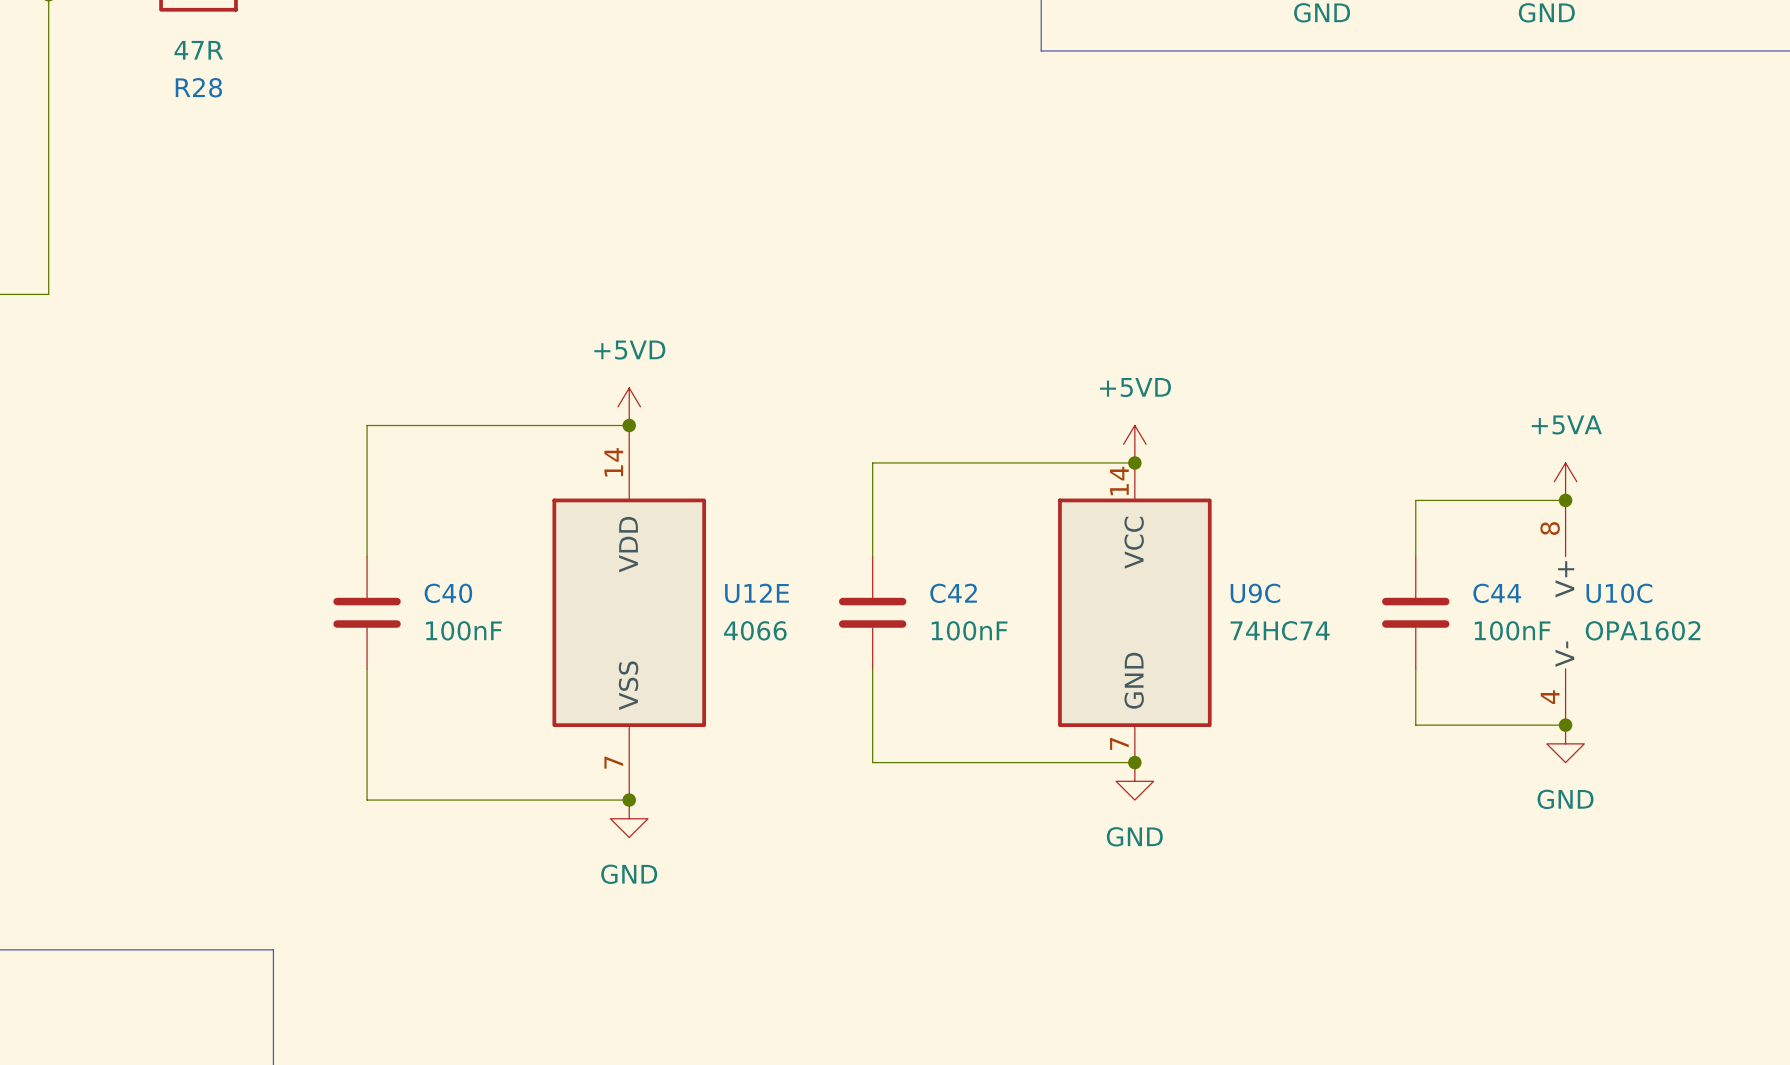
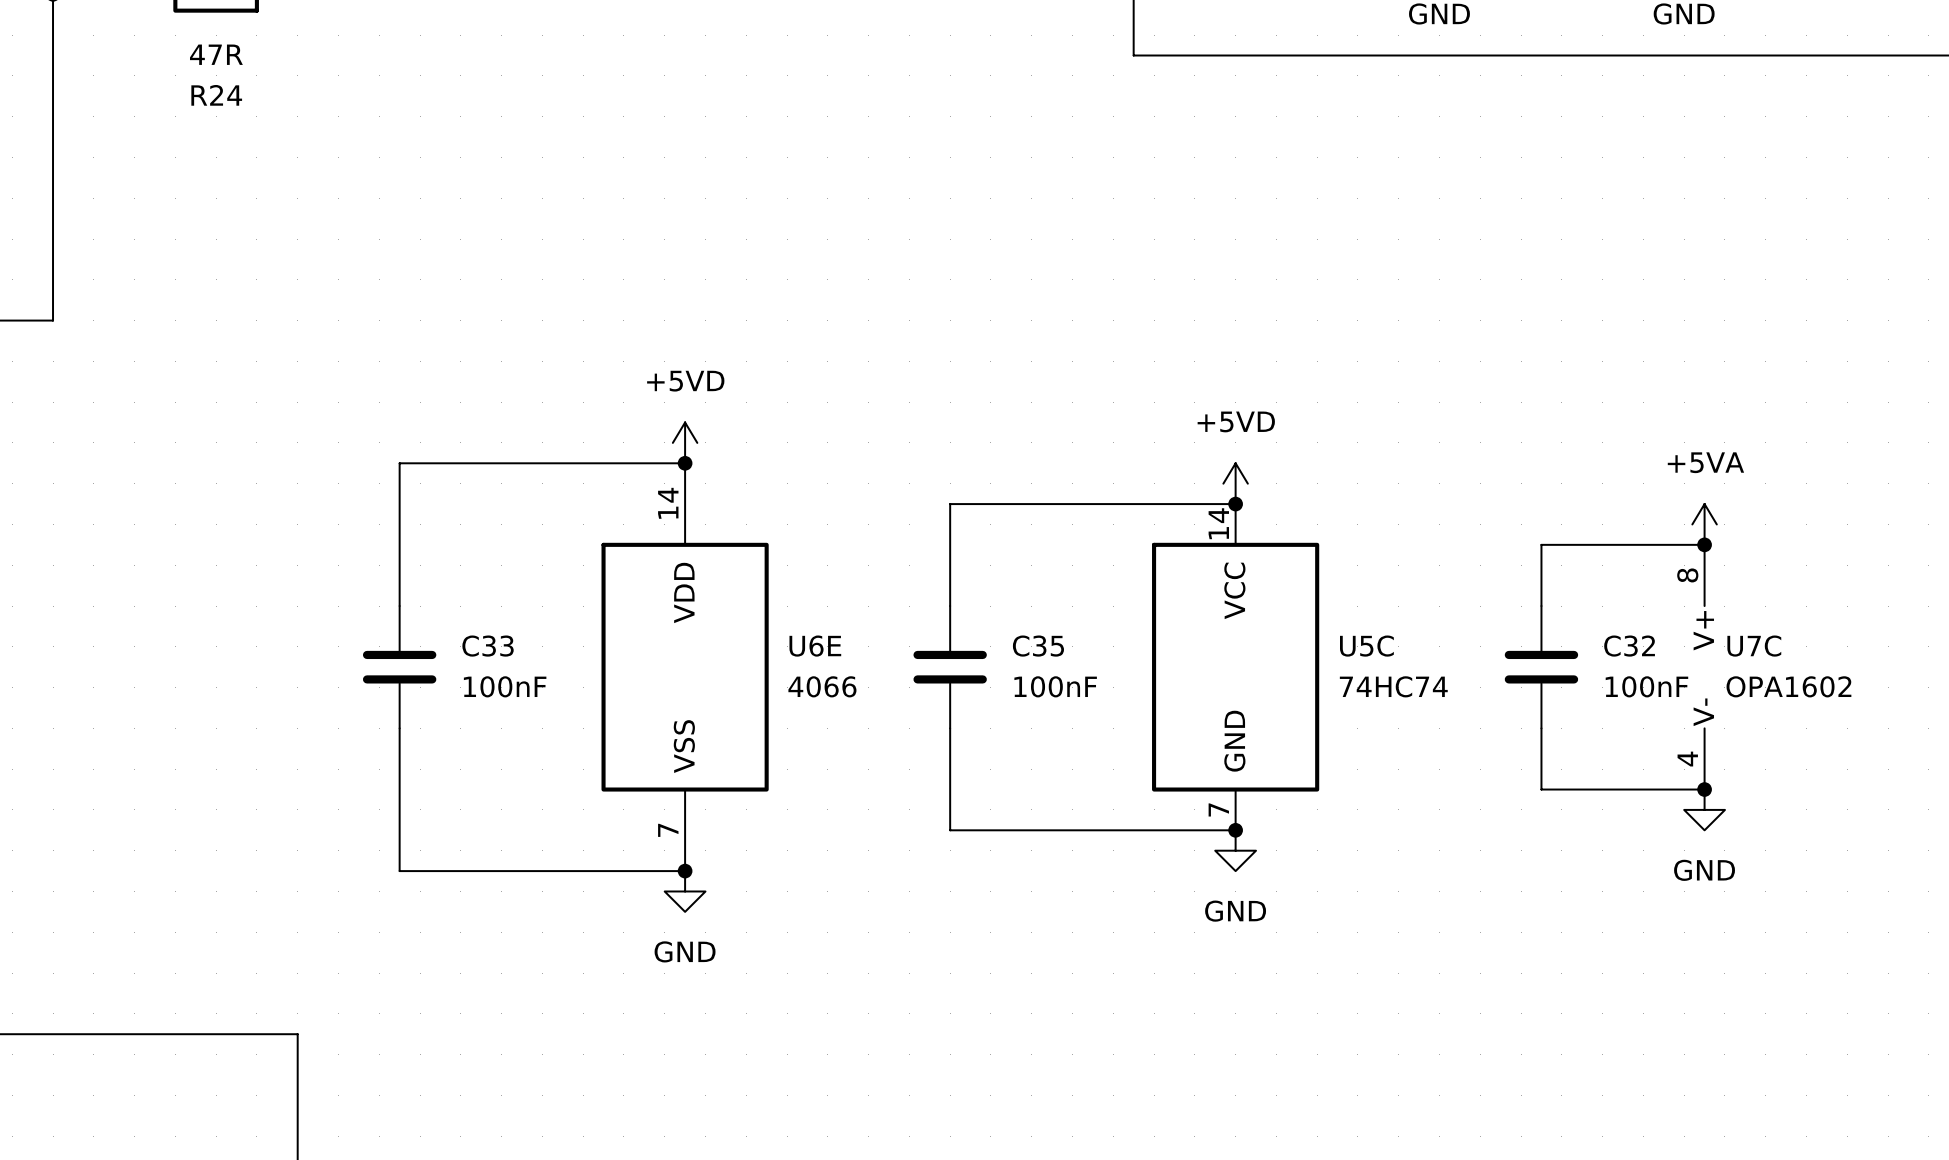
R28 name: R28 (198, 87) -> R24 (216, 95)
C40 name: C40 (448, 593) -> C33 (488, 646)
U12E name: U12E (757, 593) -> U6E (815, 646)
C42 name: C42 (953, 593) -> C35 (1038, 646)
U9C name: U9C (1255, 593) -> U5C (1366, 646)
C44 name: C44 (1497, 593) -> C32 (1629, 646)
U10C name: U10C (1619, 593) -> U7C (1754, 646)

